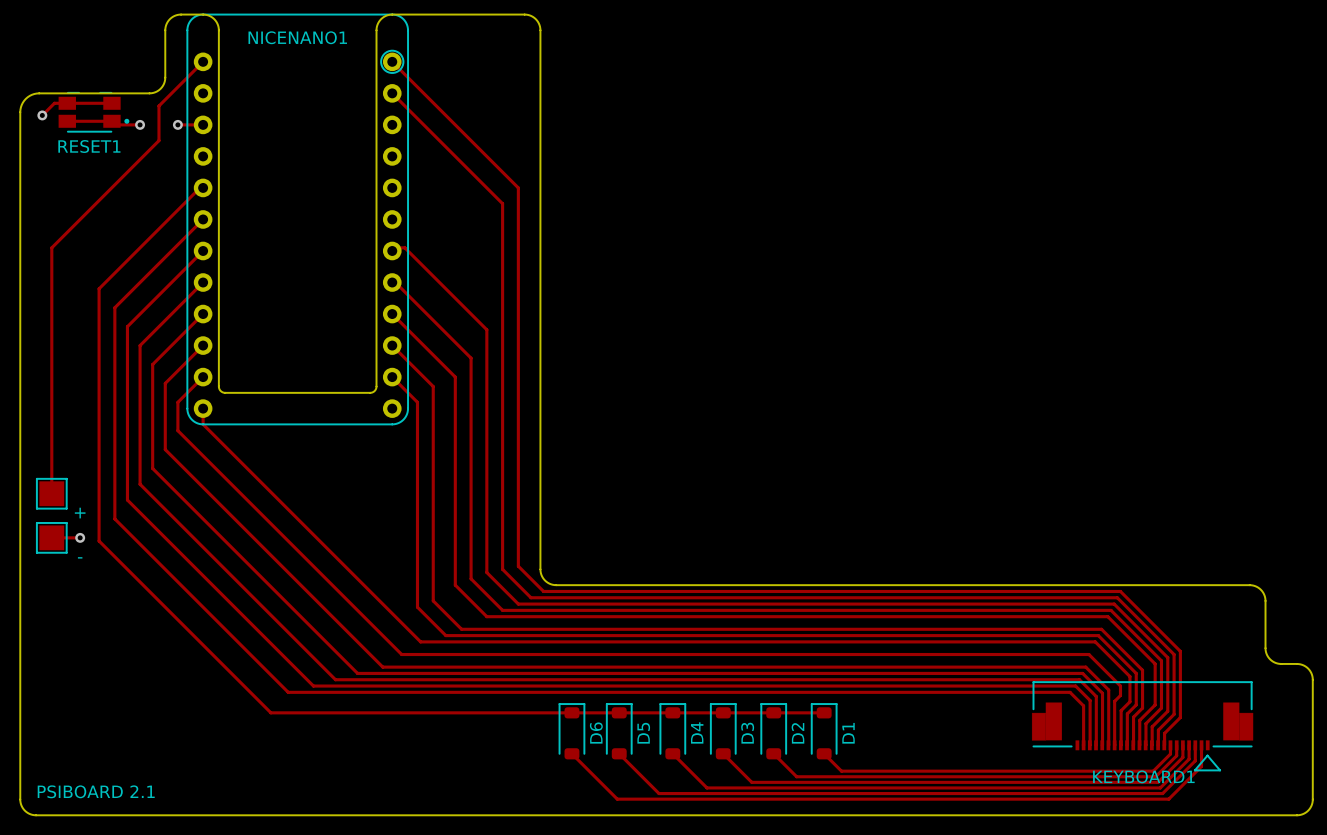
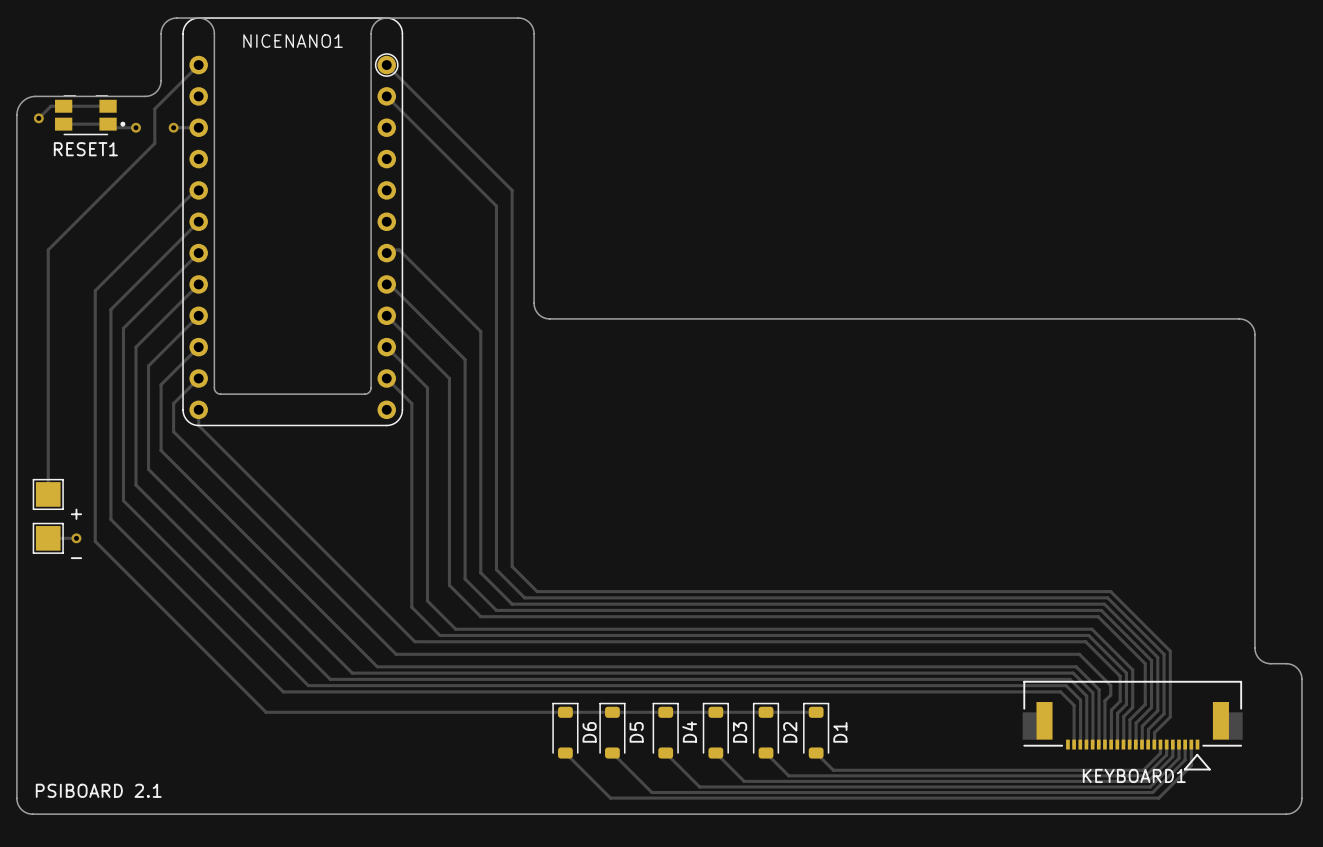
board edge: (540, 301) (540, 569) (542, 577) (550, 584) (1249, 585) (1260, 589) (1265, 600) -> (534, 303) (538, 314) (549, 318) (1244, 319) (1251, 324) (1254, 334) (1254, 601)

